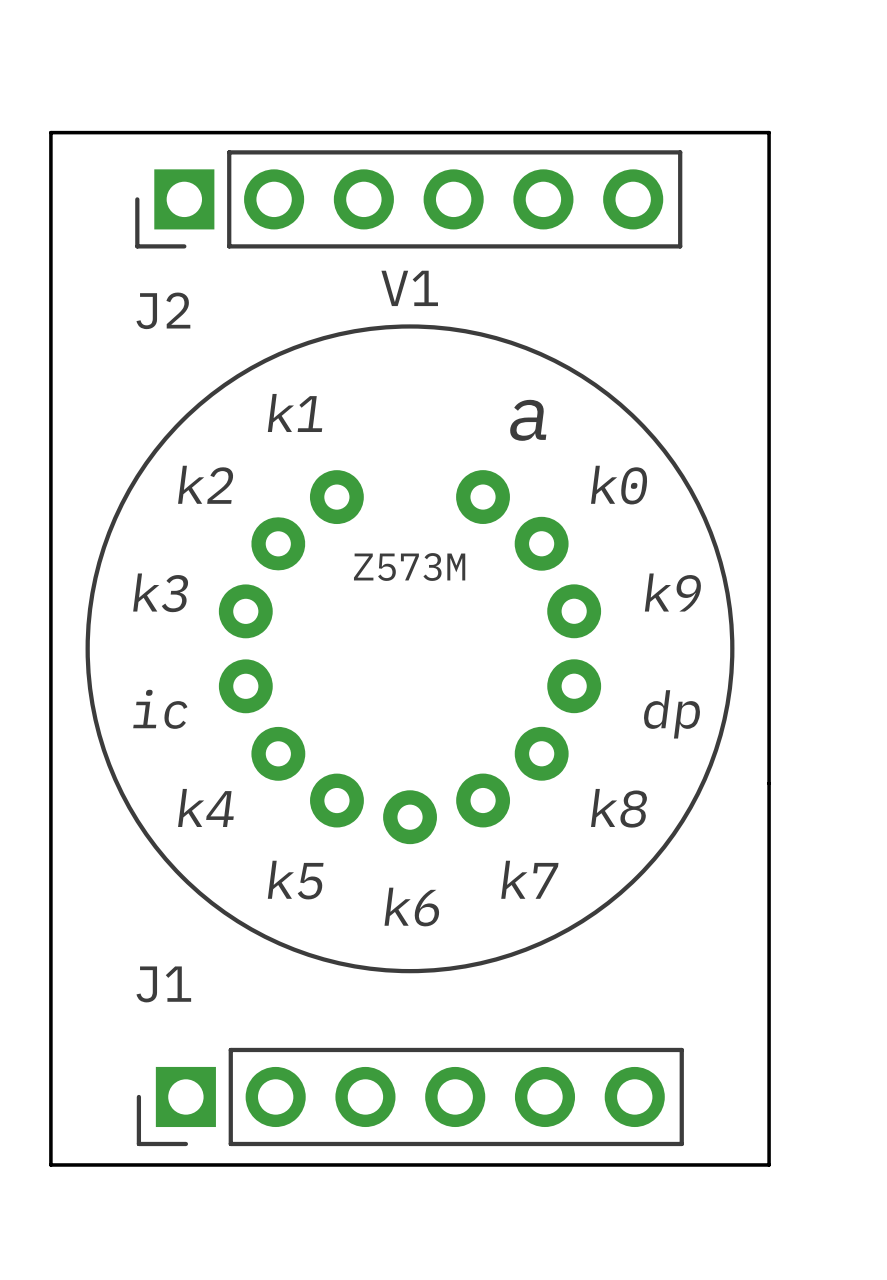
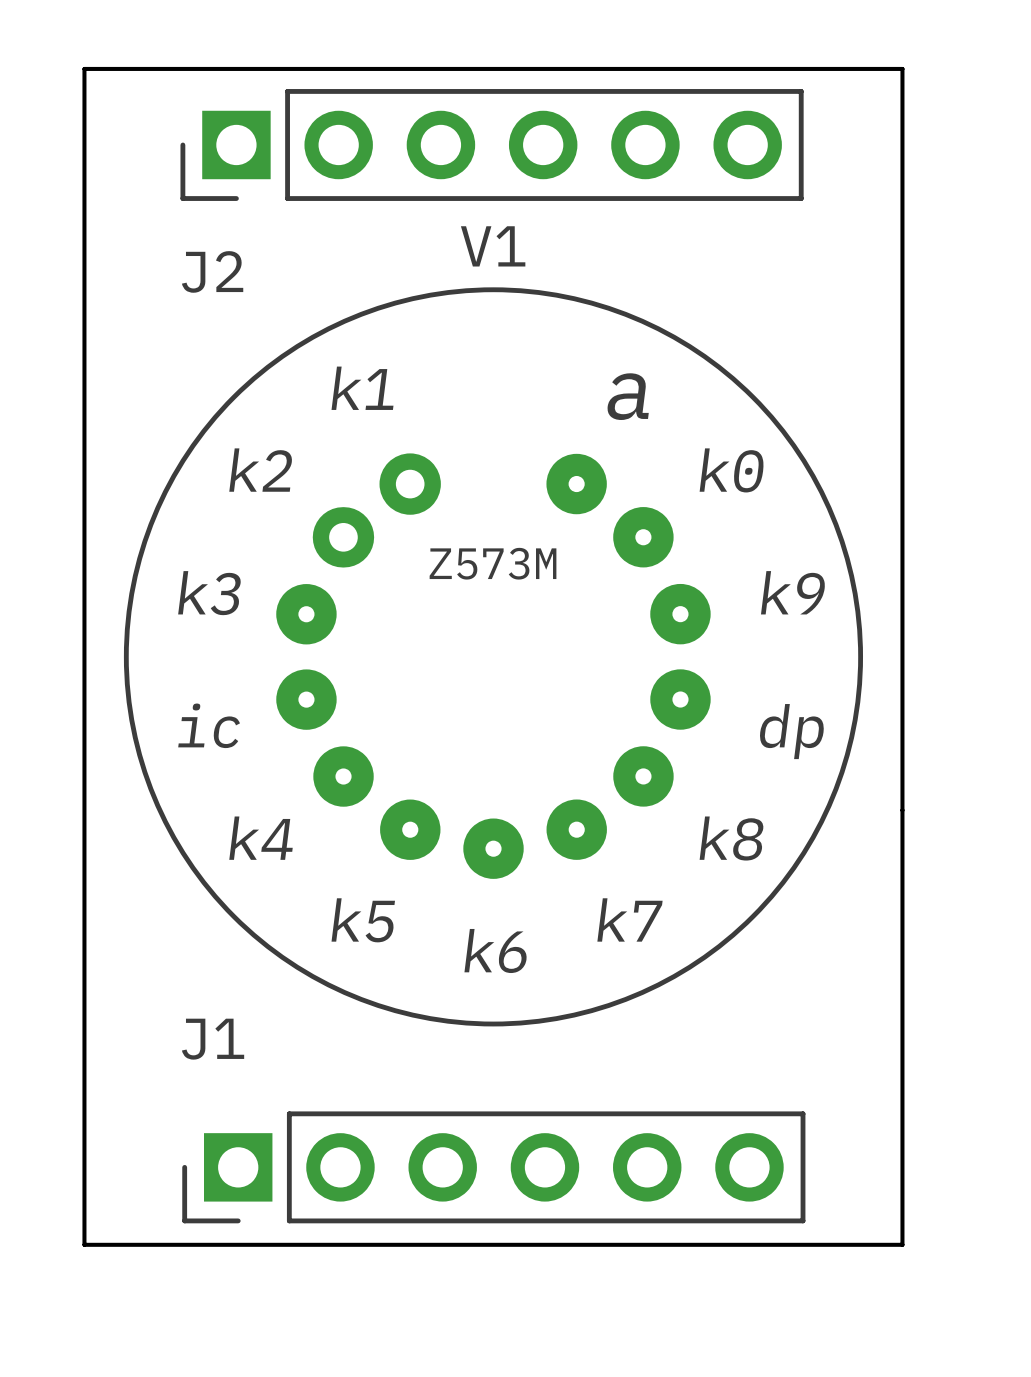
V1 footprint: [85, 324, 735, 974] -> [123, 287, 864, 1027]

